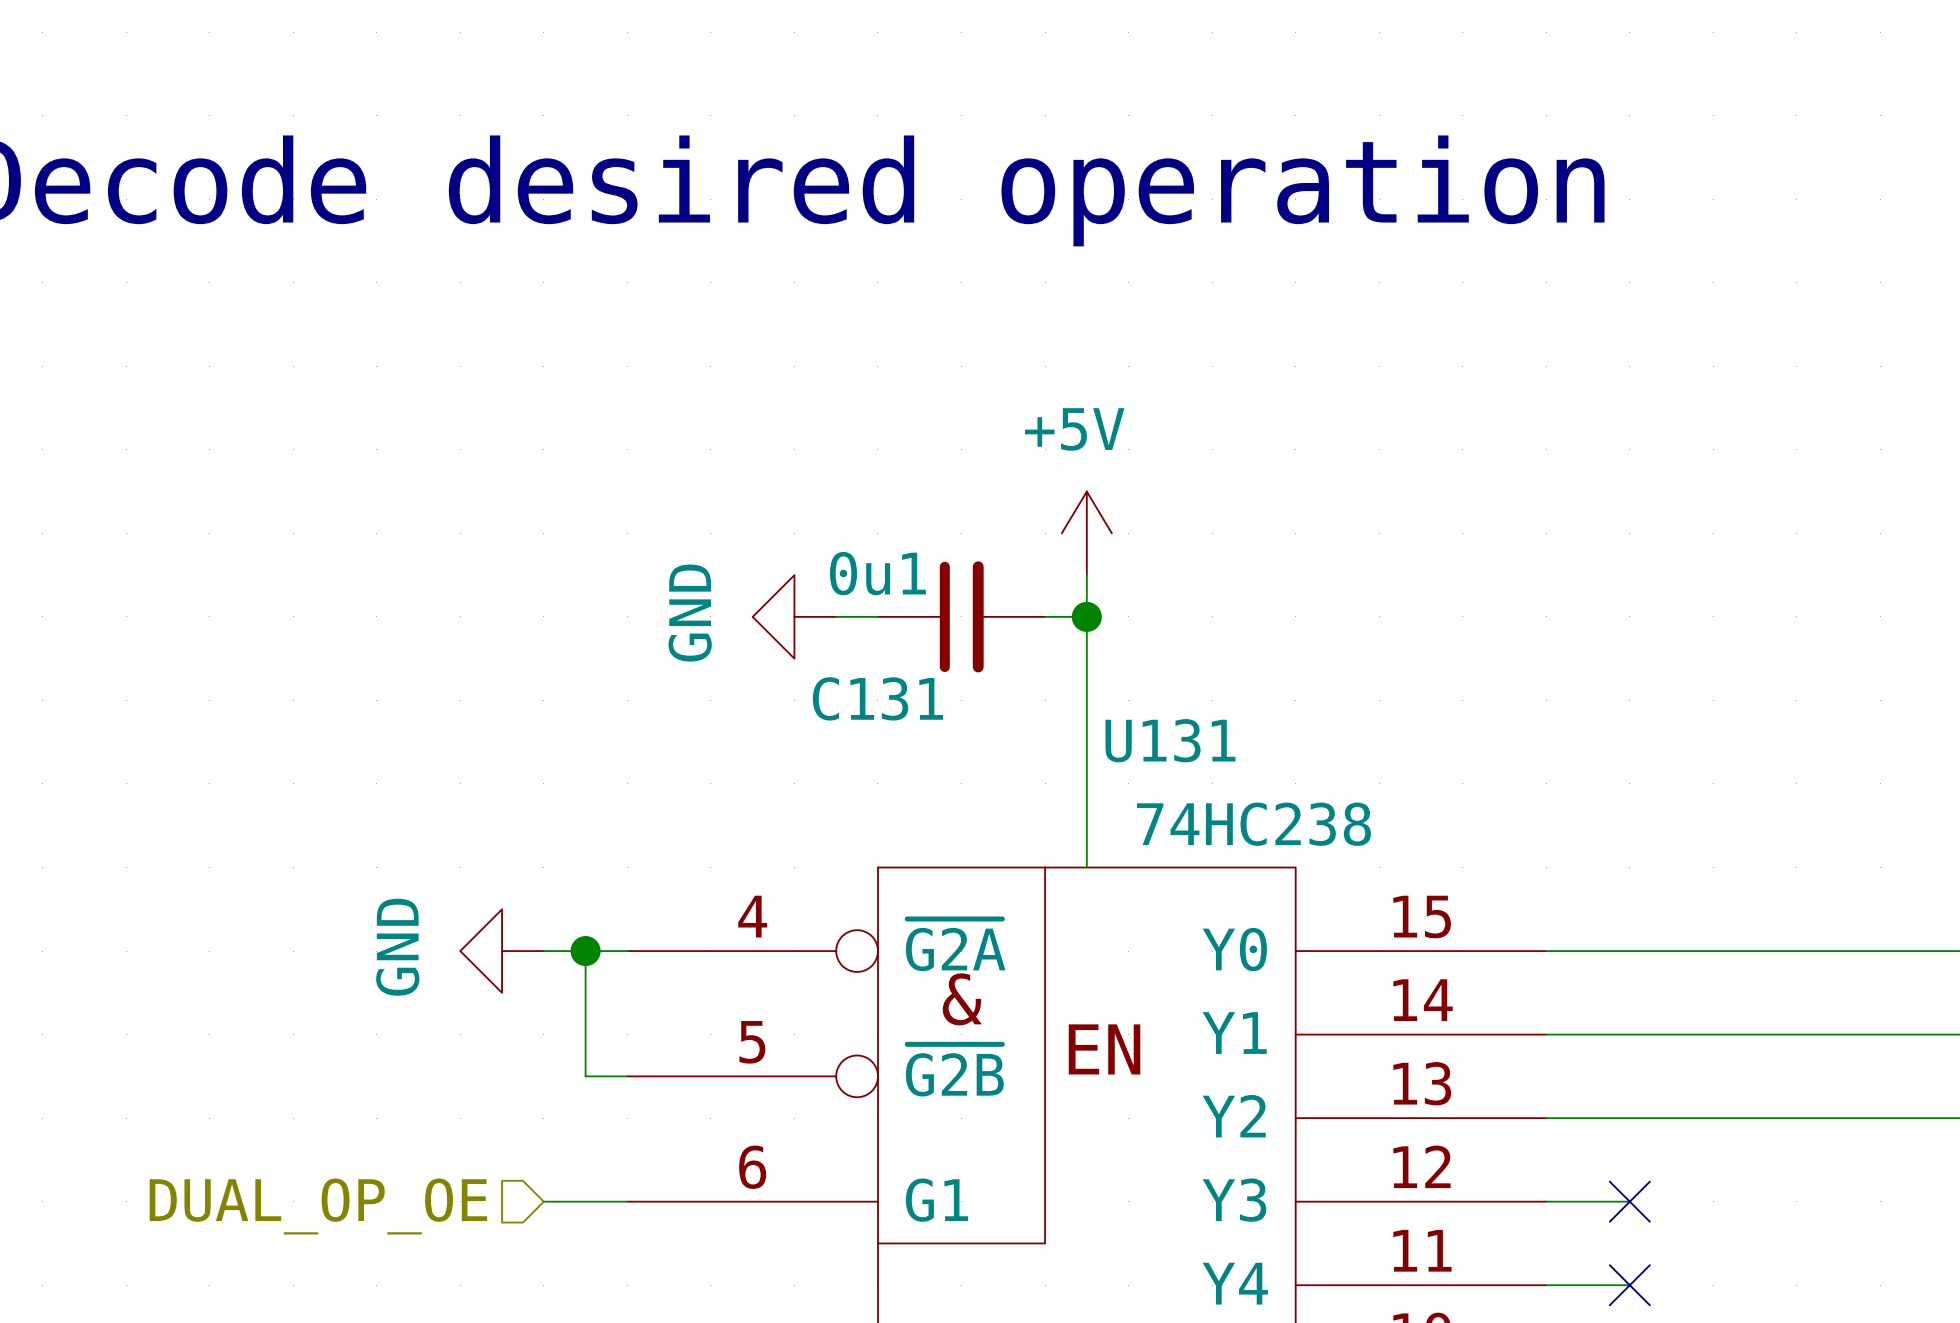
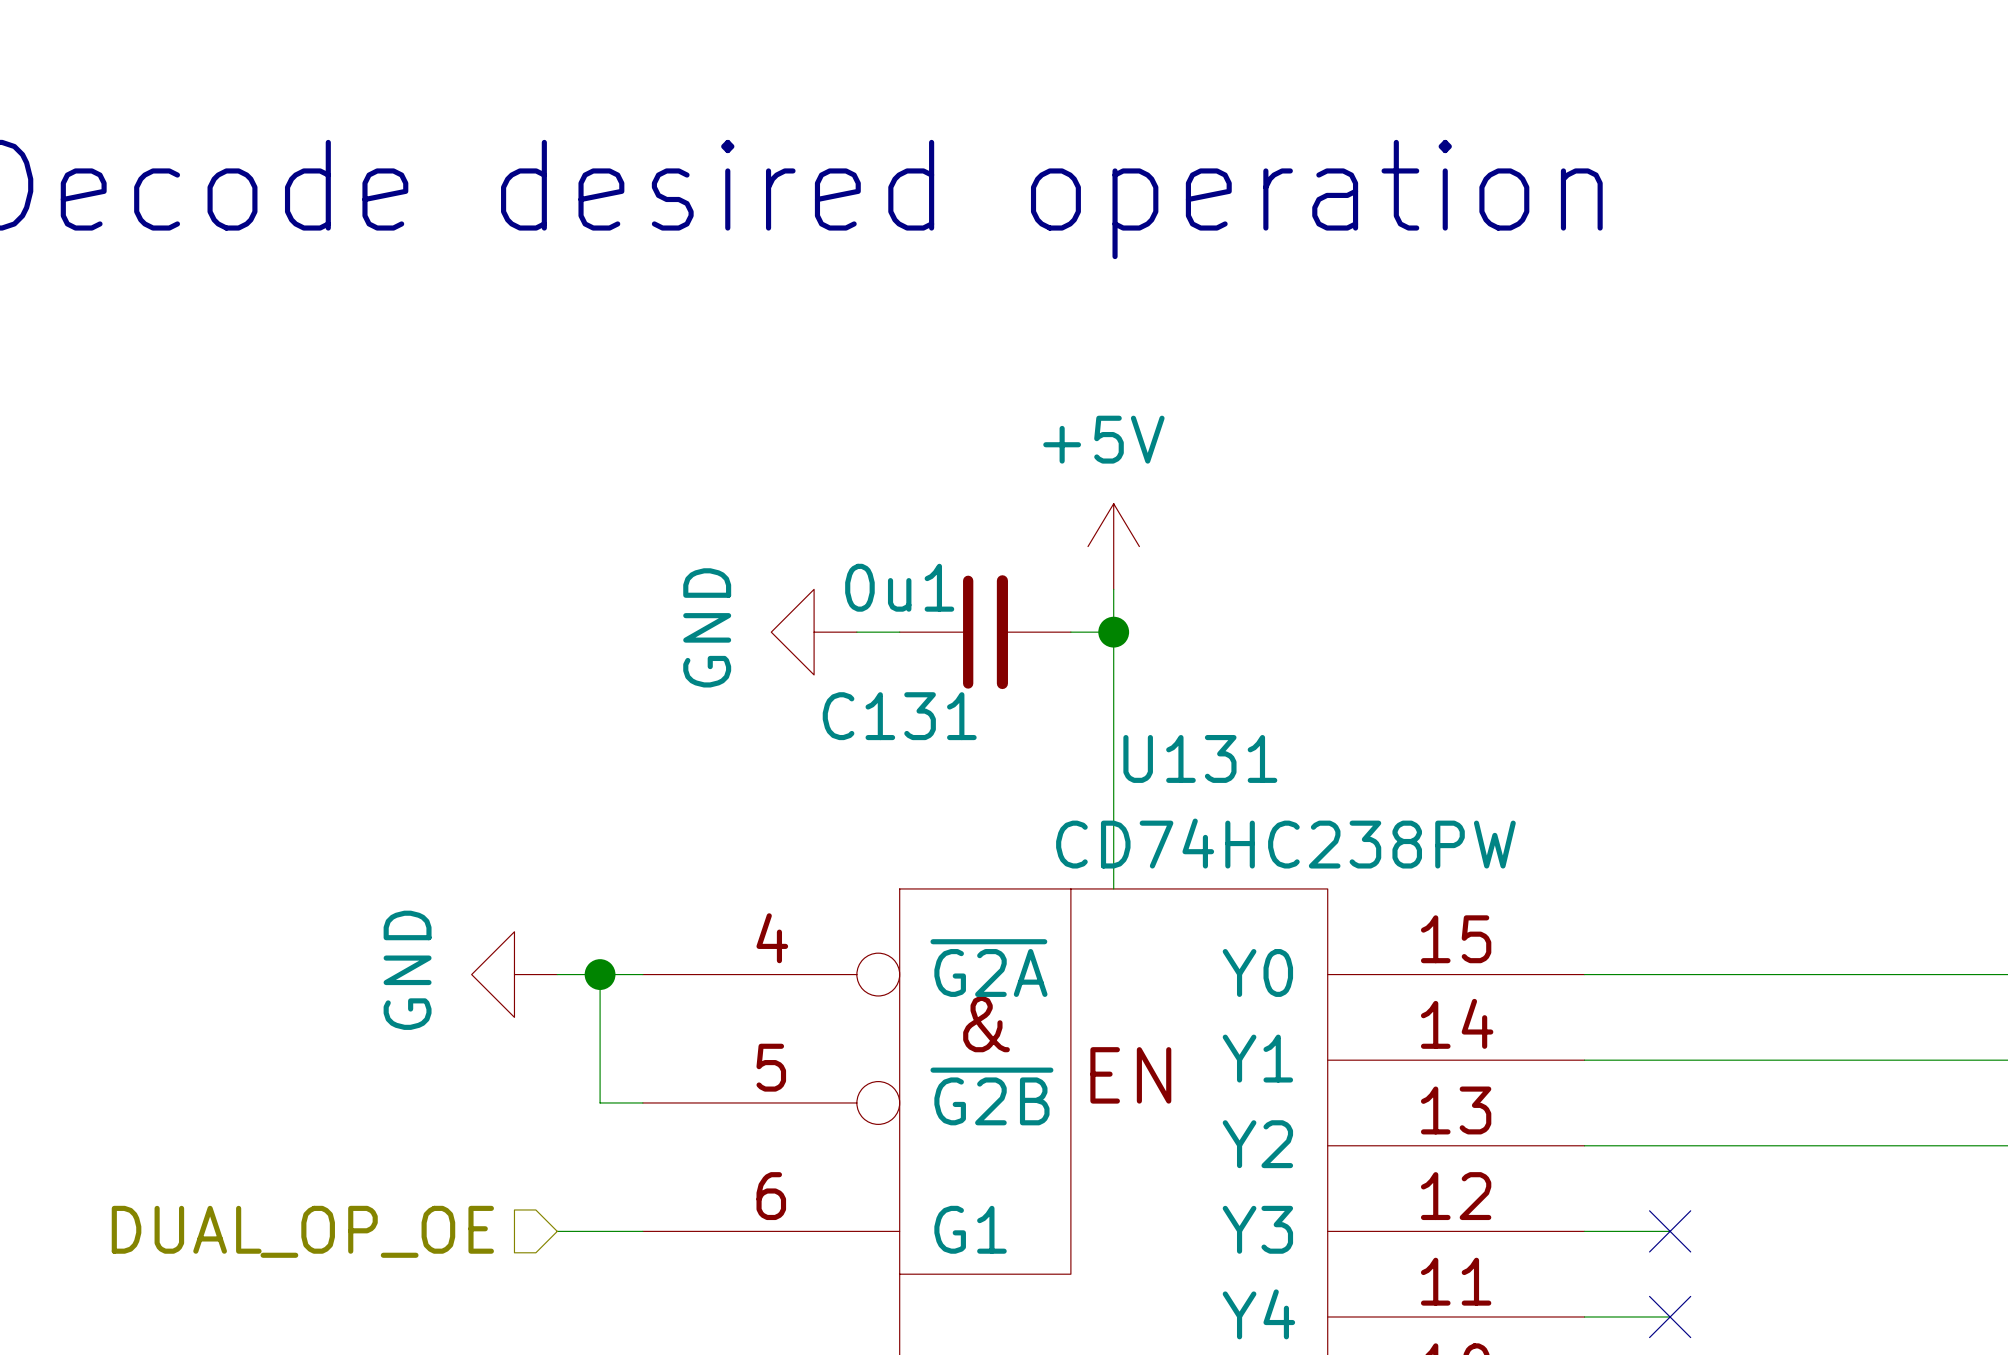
U131 value: 74HC238 (1254, 824) -> CD74HC238PW (1285, 843)

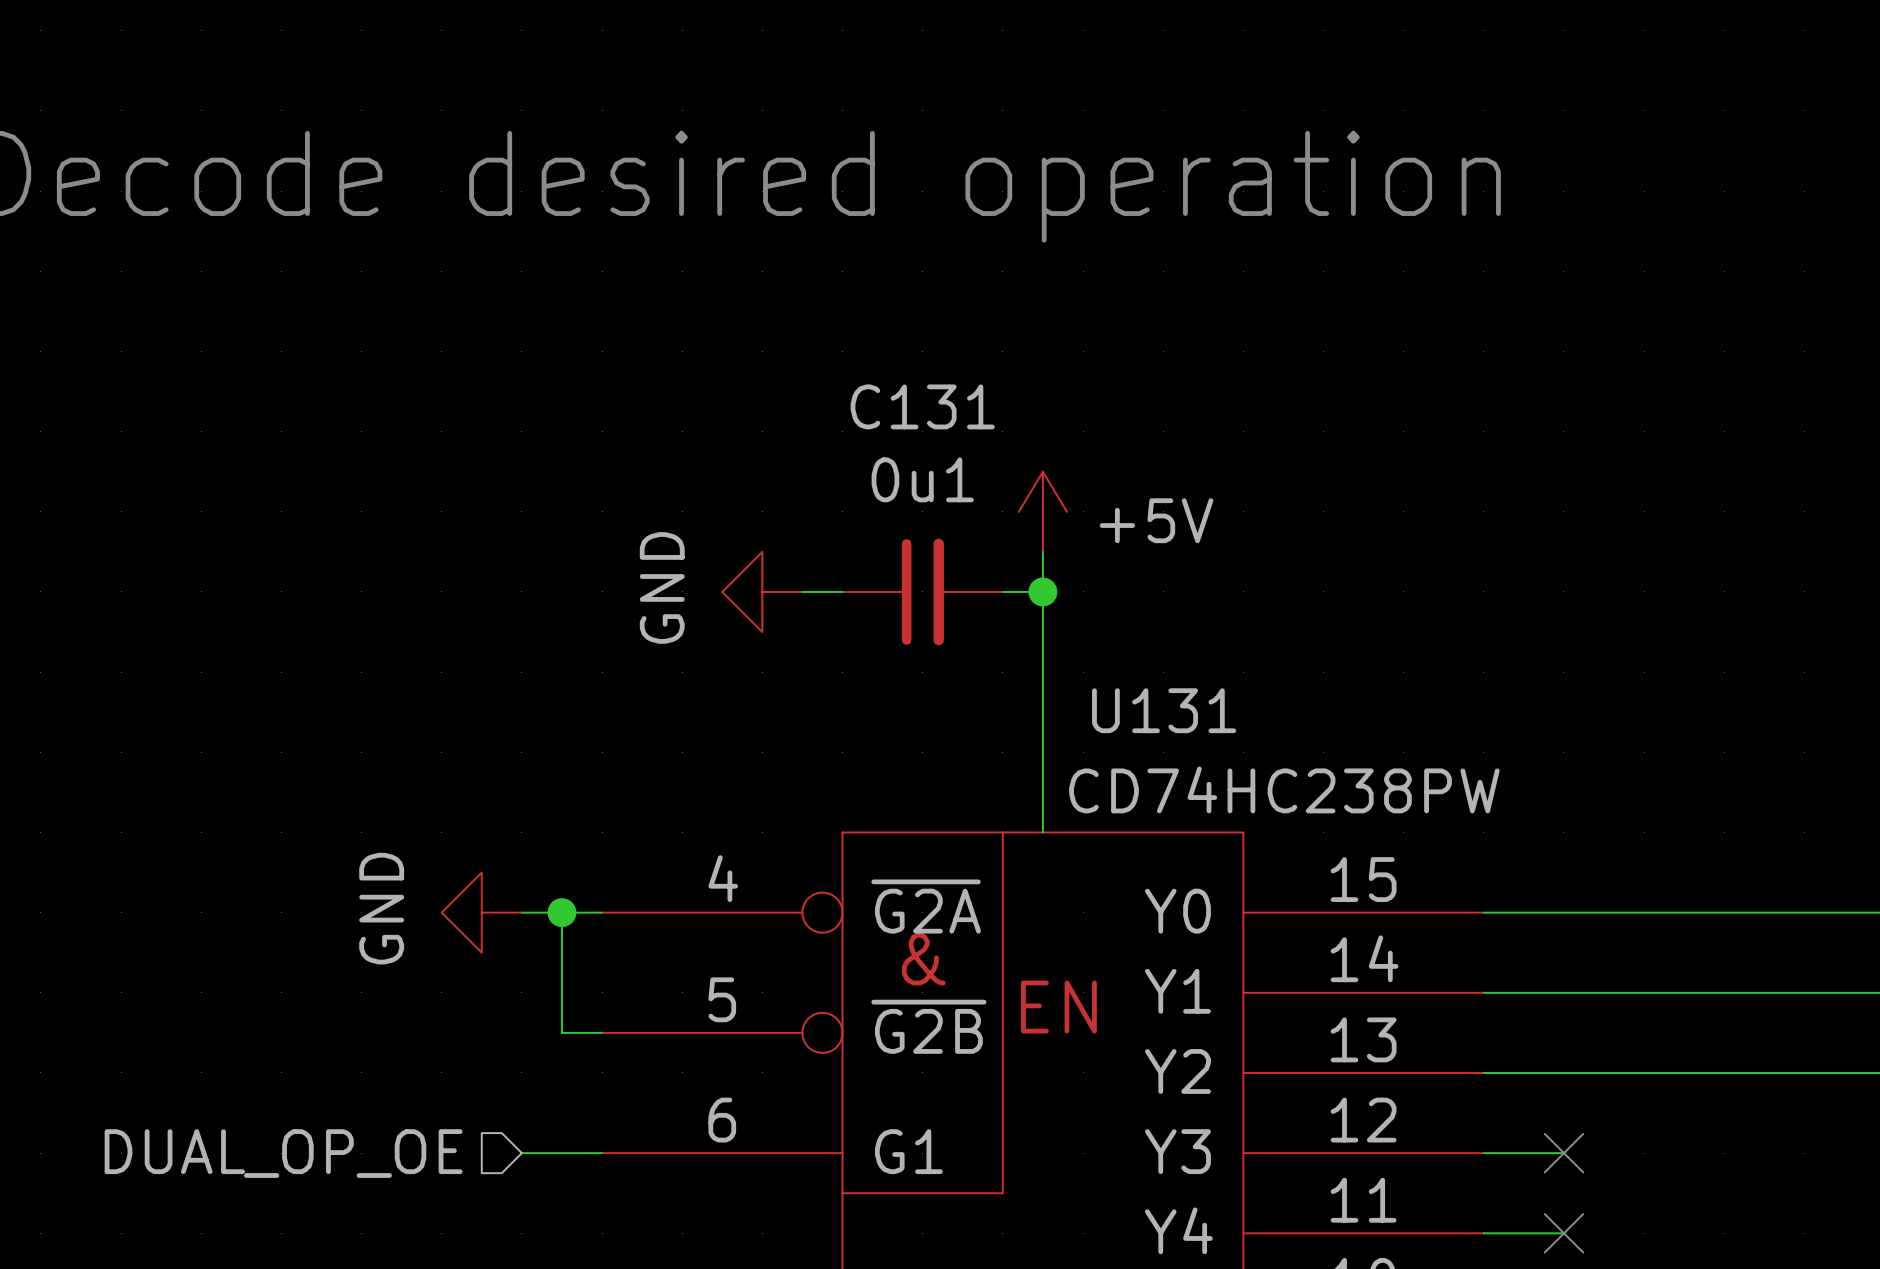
power symbol text position: +5V (1103, 439) -> +5V (1156, 520)
C131 value position: 0u1 (899, 587) -> 0u1 (922, 479)
C131 name position: C131 (899, 716) -> C131 (922, 406)
U131 name position: U131 (1200, 758) -> U131 (1164, 710)
U131 value position: CD74HC238PW (1285, 843) -> CD74HC238PW (1284, 789)

